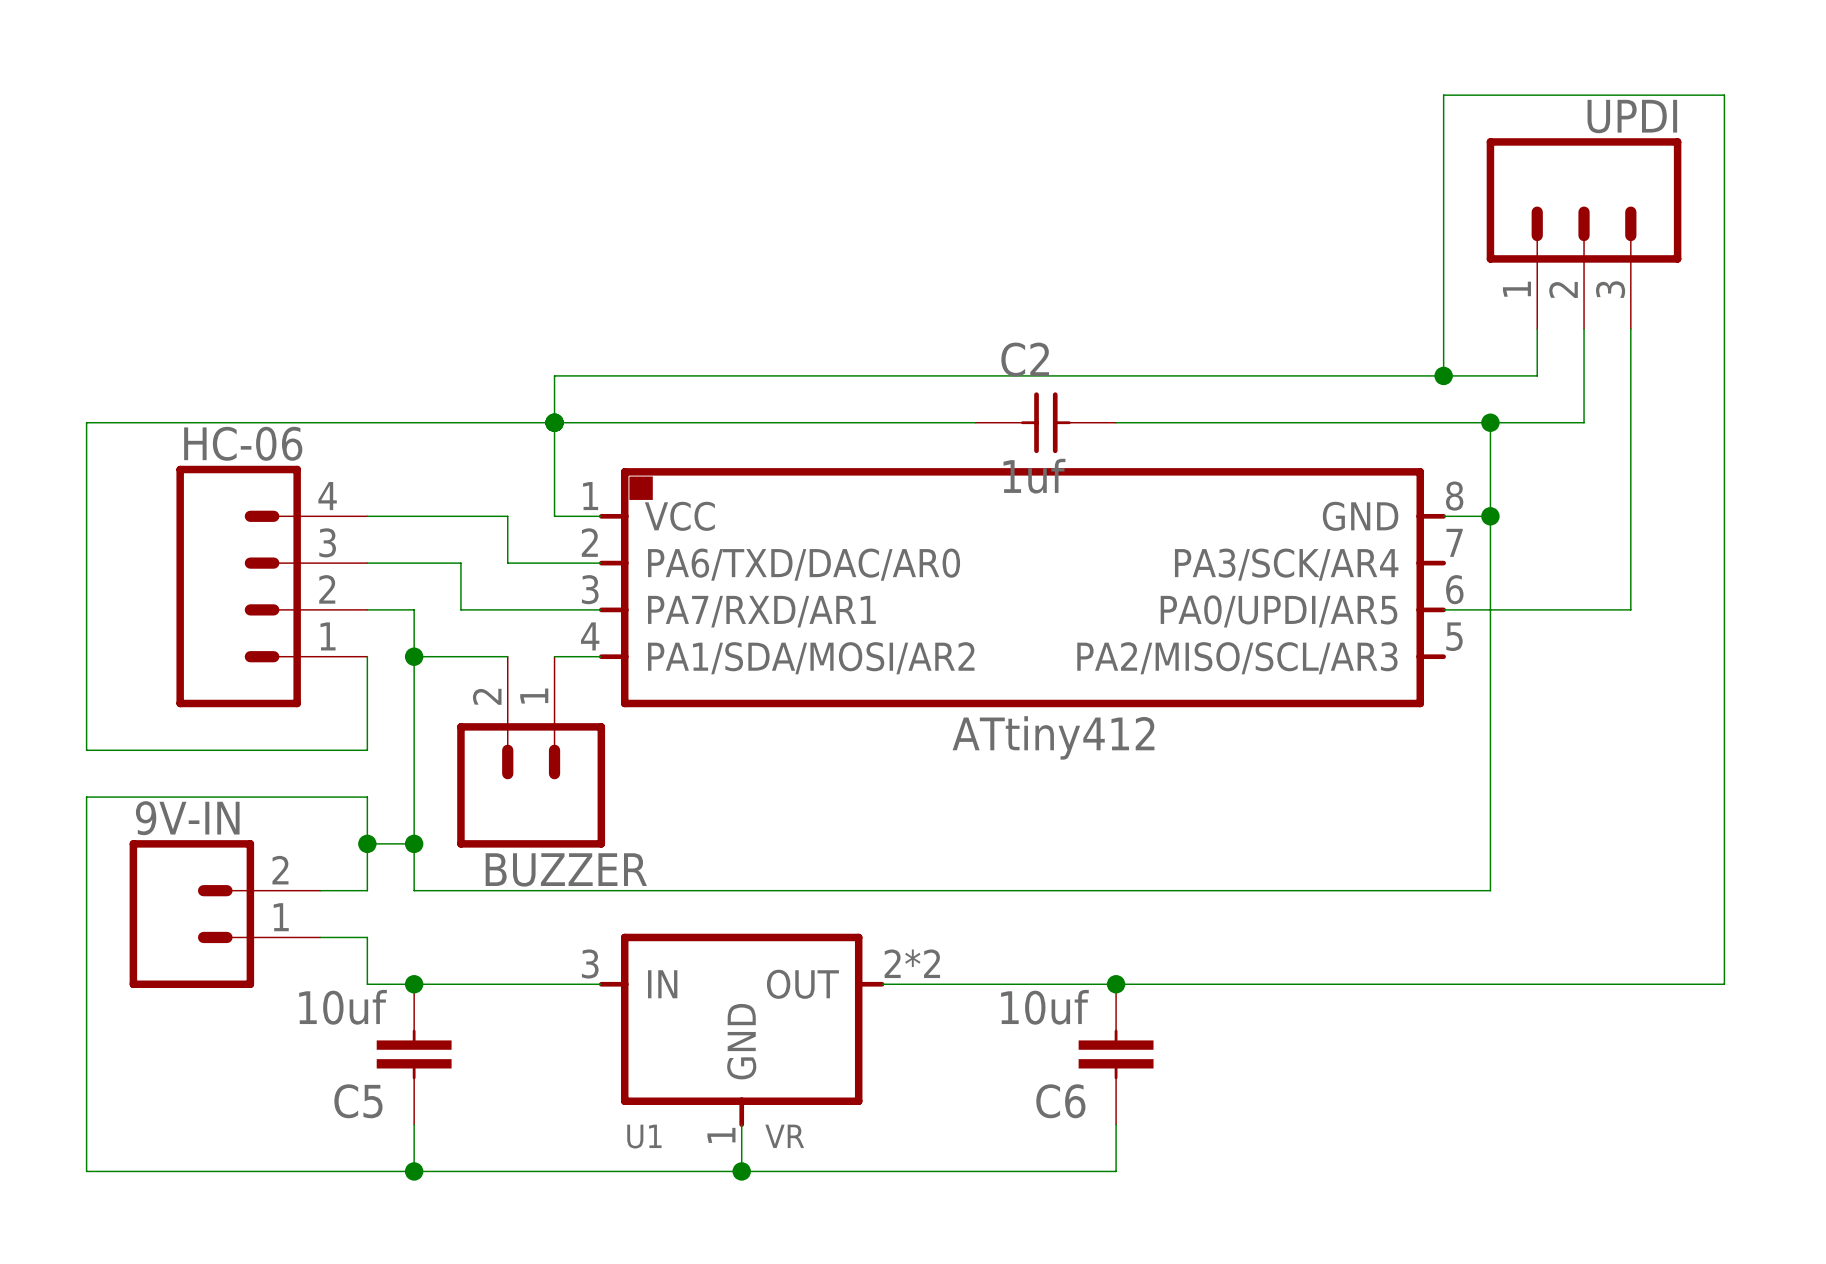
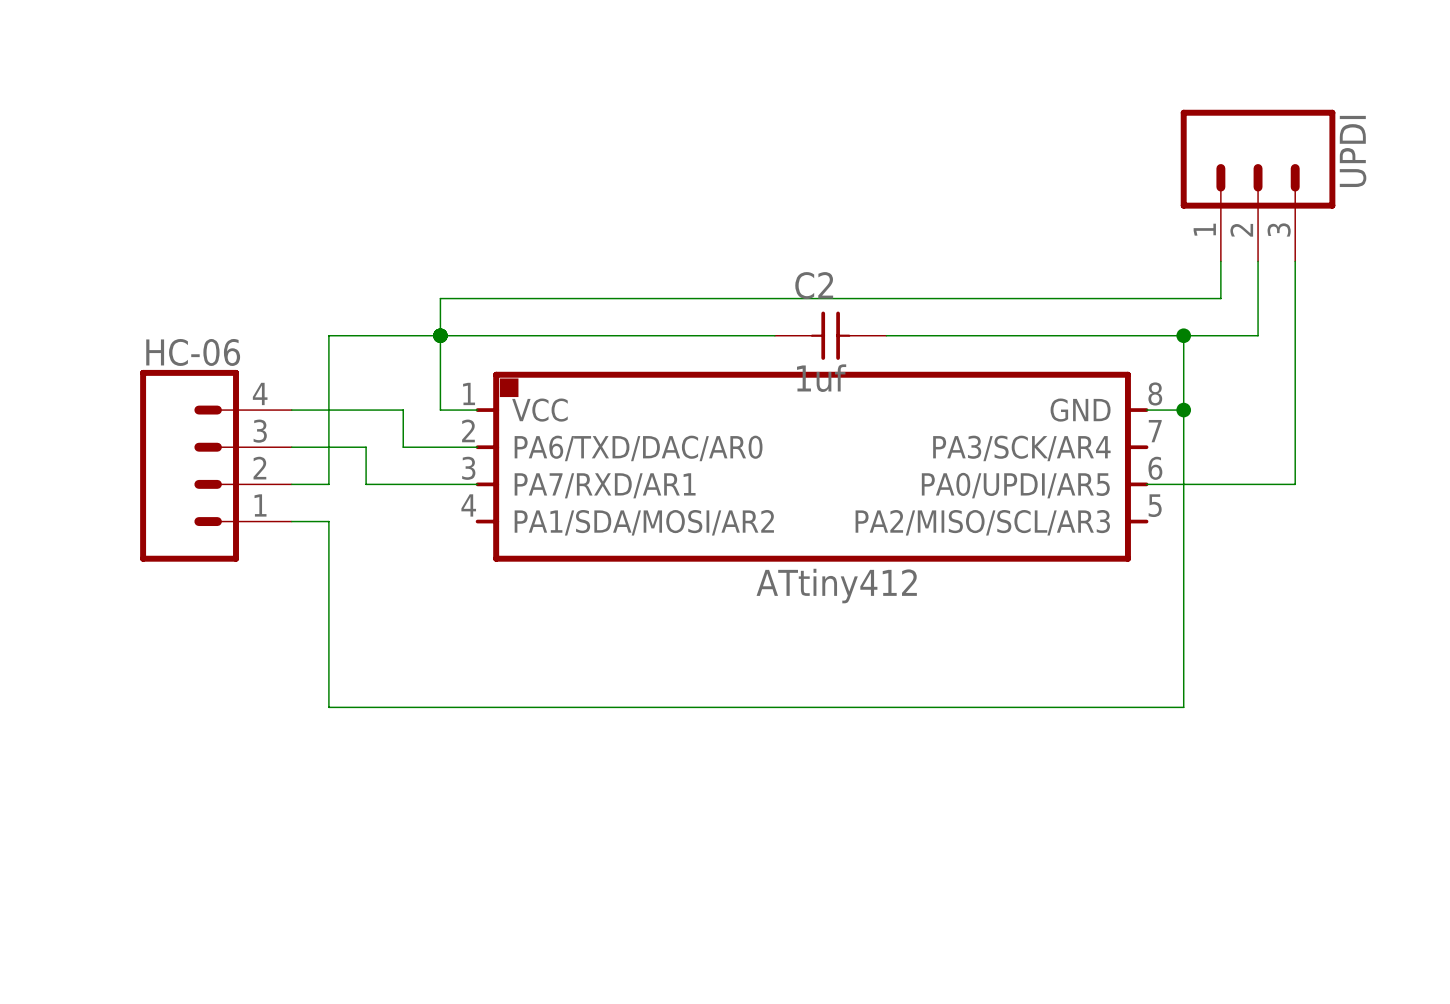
UPDI name rotation: 0° (1632, 116) -> 90° counterclockwise (1353, 151)
wire: (1443, 375) (1443, 95) (1724, 95) (1724, 984) (882, 984) -> none
junction: (1443, 375) -> none
wire: (414, 422) (86, 422) (86, 750) (367, 750) (367, 656) -> (328, 335) (328, 484)
wire: (414, 609) (414, 656) (507, 656) -> none
junction: (414, 656) -> none
wire: (554, 656) (601, 656) -> (291, 521) (328, 521)
BUZZER: (531, 752) -> none
wire: (367, 843) (414, 843) -> none
junction: (367, 843) -> none
junction: (414, 843) -> none
wire: (320, 890) (367, 890) (367, 797) (86, 797) (86, 1171) (1116, 1171) (1116, 1124) -> none
9V-IN: (225, 914) -> none
wire: (320, 937) (367, 937) (367, 984) (601, 984) -> none
junction: (414, 984) -> none
junction: (1116, 984) -> none
U1: VR (741, 1030) -> none
C5: 10uf (414, 1054) -> none
C6: 10uf (1116, 1054) -> none
wire: (414, 1124) (414, 1171) -> none
wire: (741, 1124) (741, 1171) -> none
junction: (414, 1171) -> none
junction: (741, 1171) -> none

